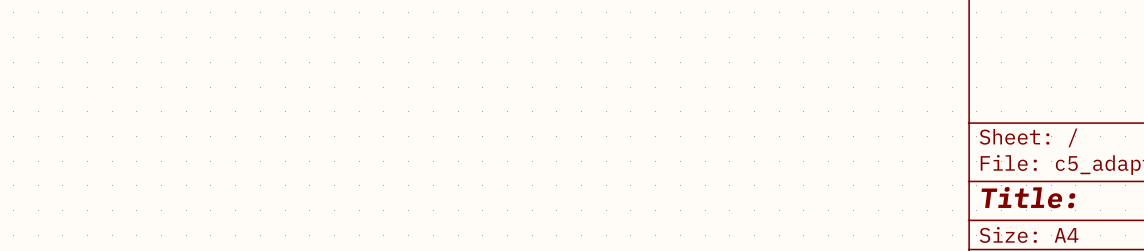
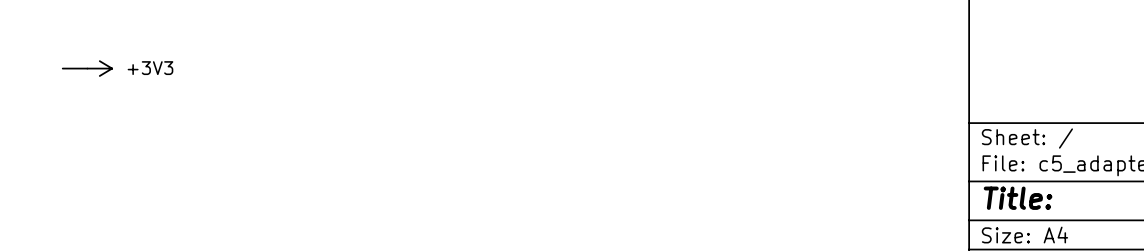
wire: none -> (62, 68) (87, 68)
power symbol: none -> +3V3 (99, 68)

